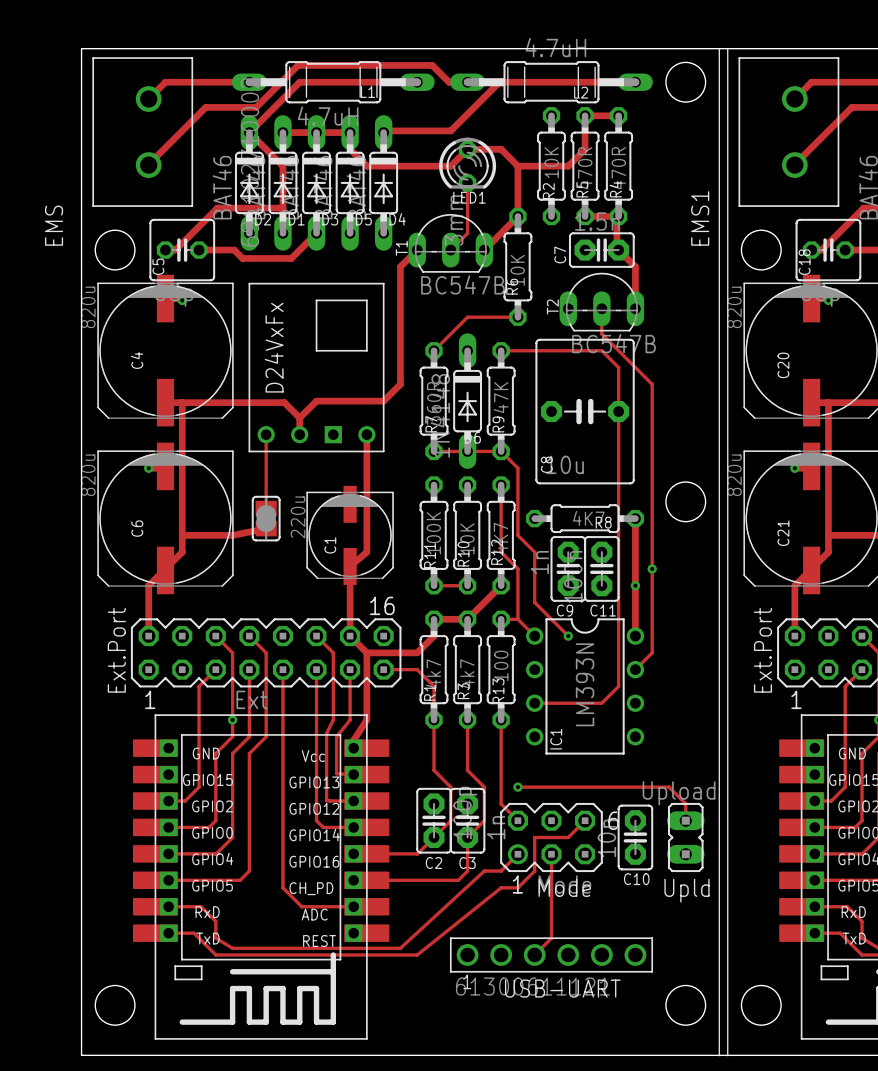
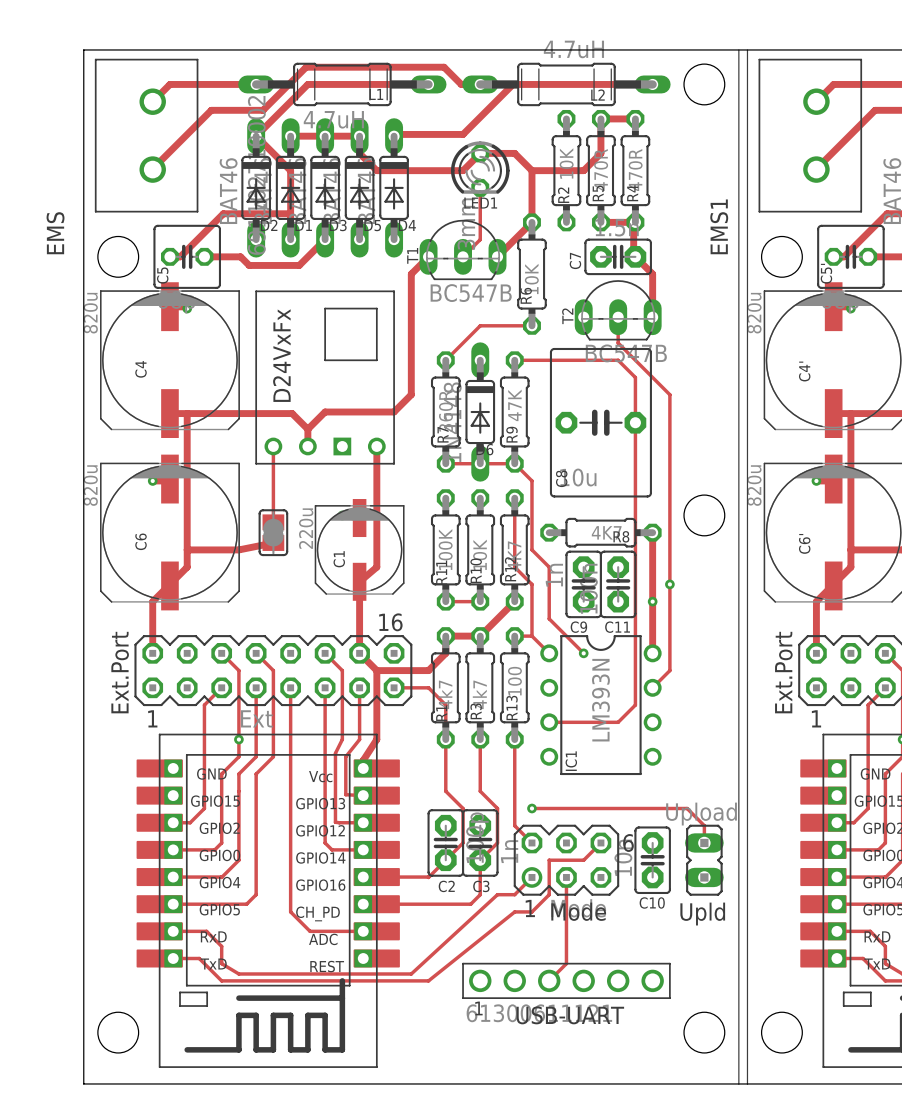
C18 name: C18 (804, 262) -> C5' (826, 273)
C20 name: C20 (783, 365) -> C4' (804, 371)
C21 name: C21 (783, 533) -> C6' (804, 543)

